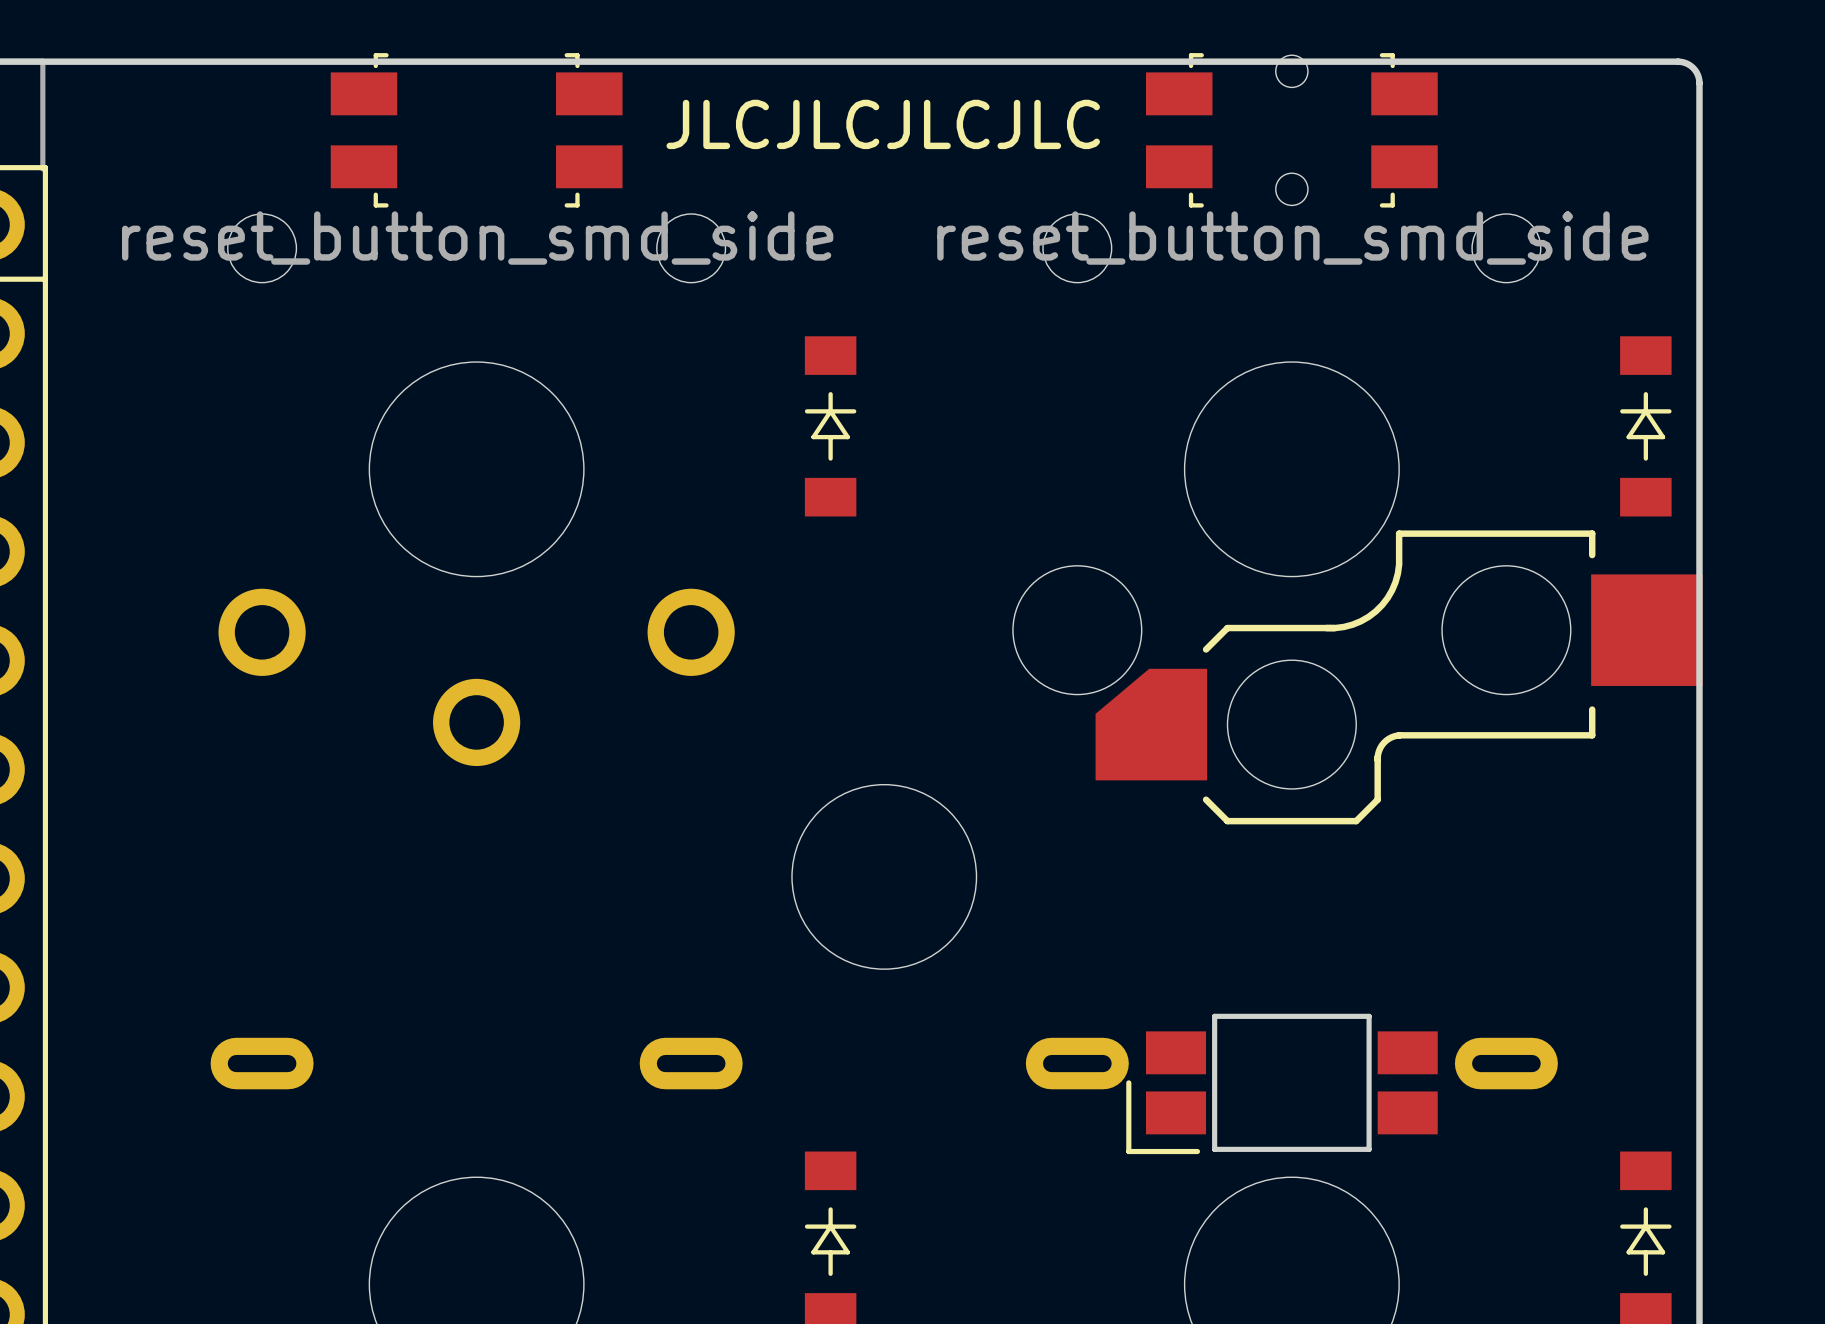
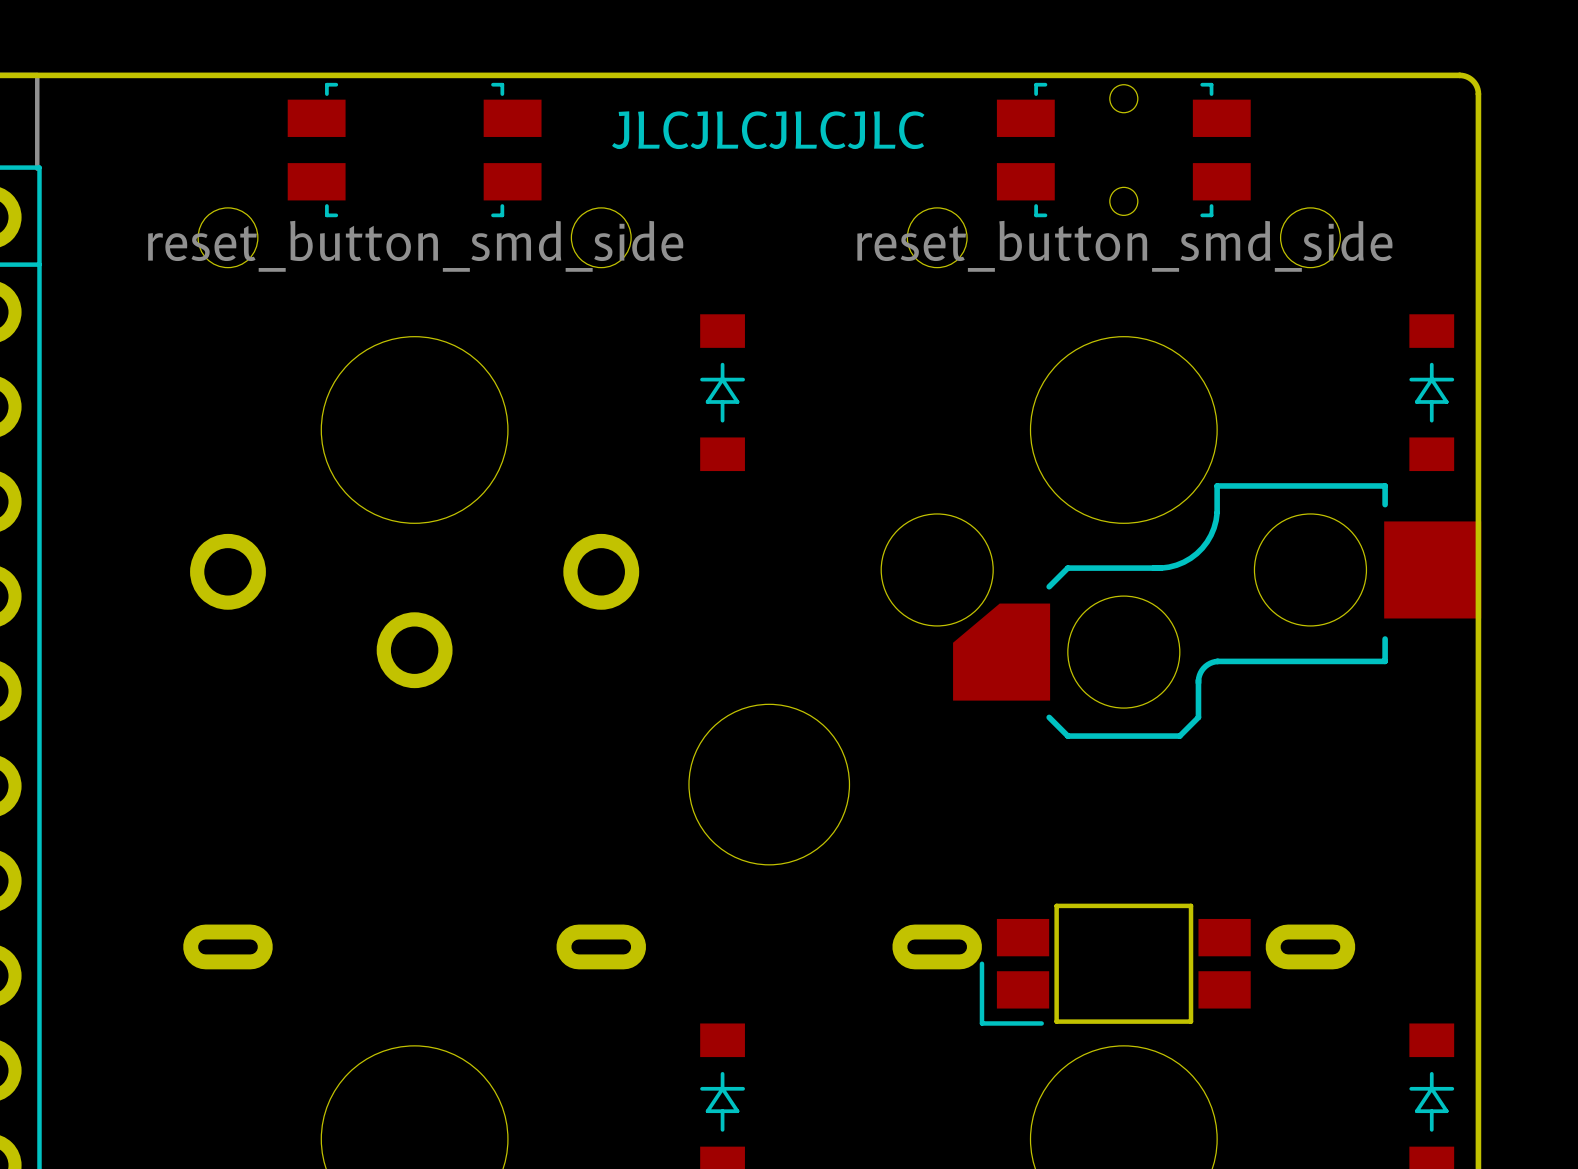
part position: (476, 130) -> (414, 150)
part position: (1291, 130) -> (1123, 150)

